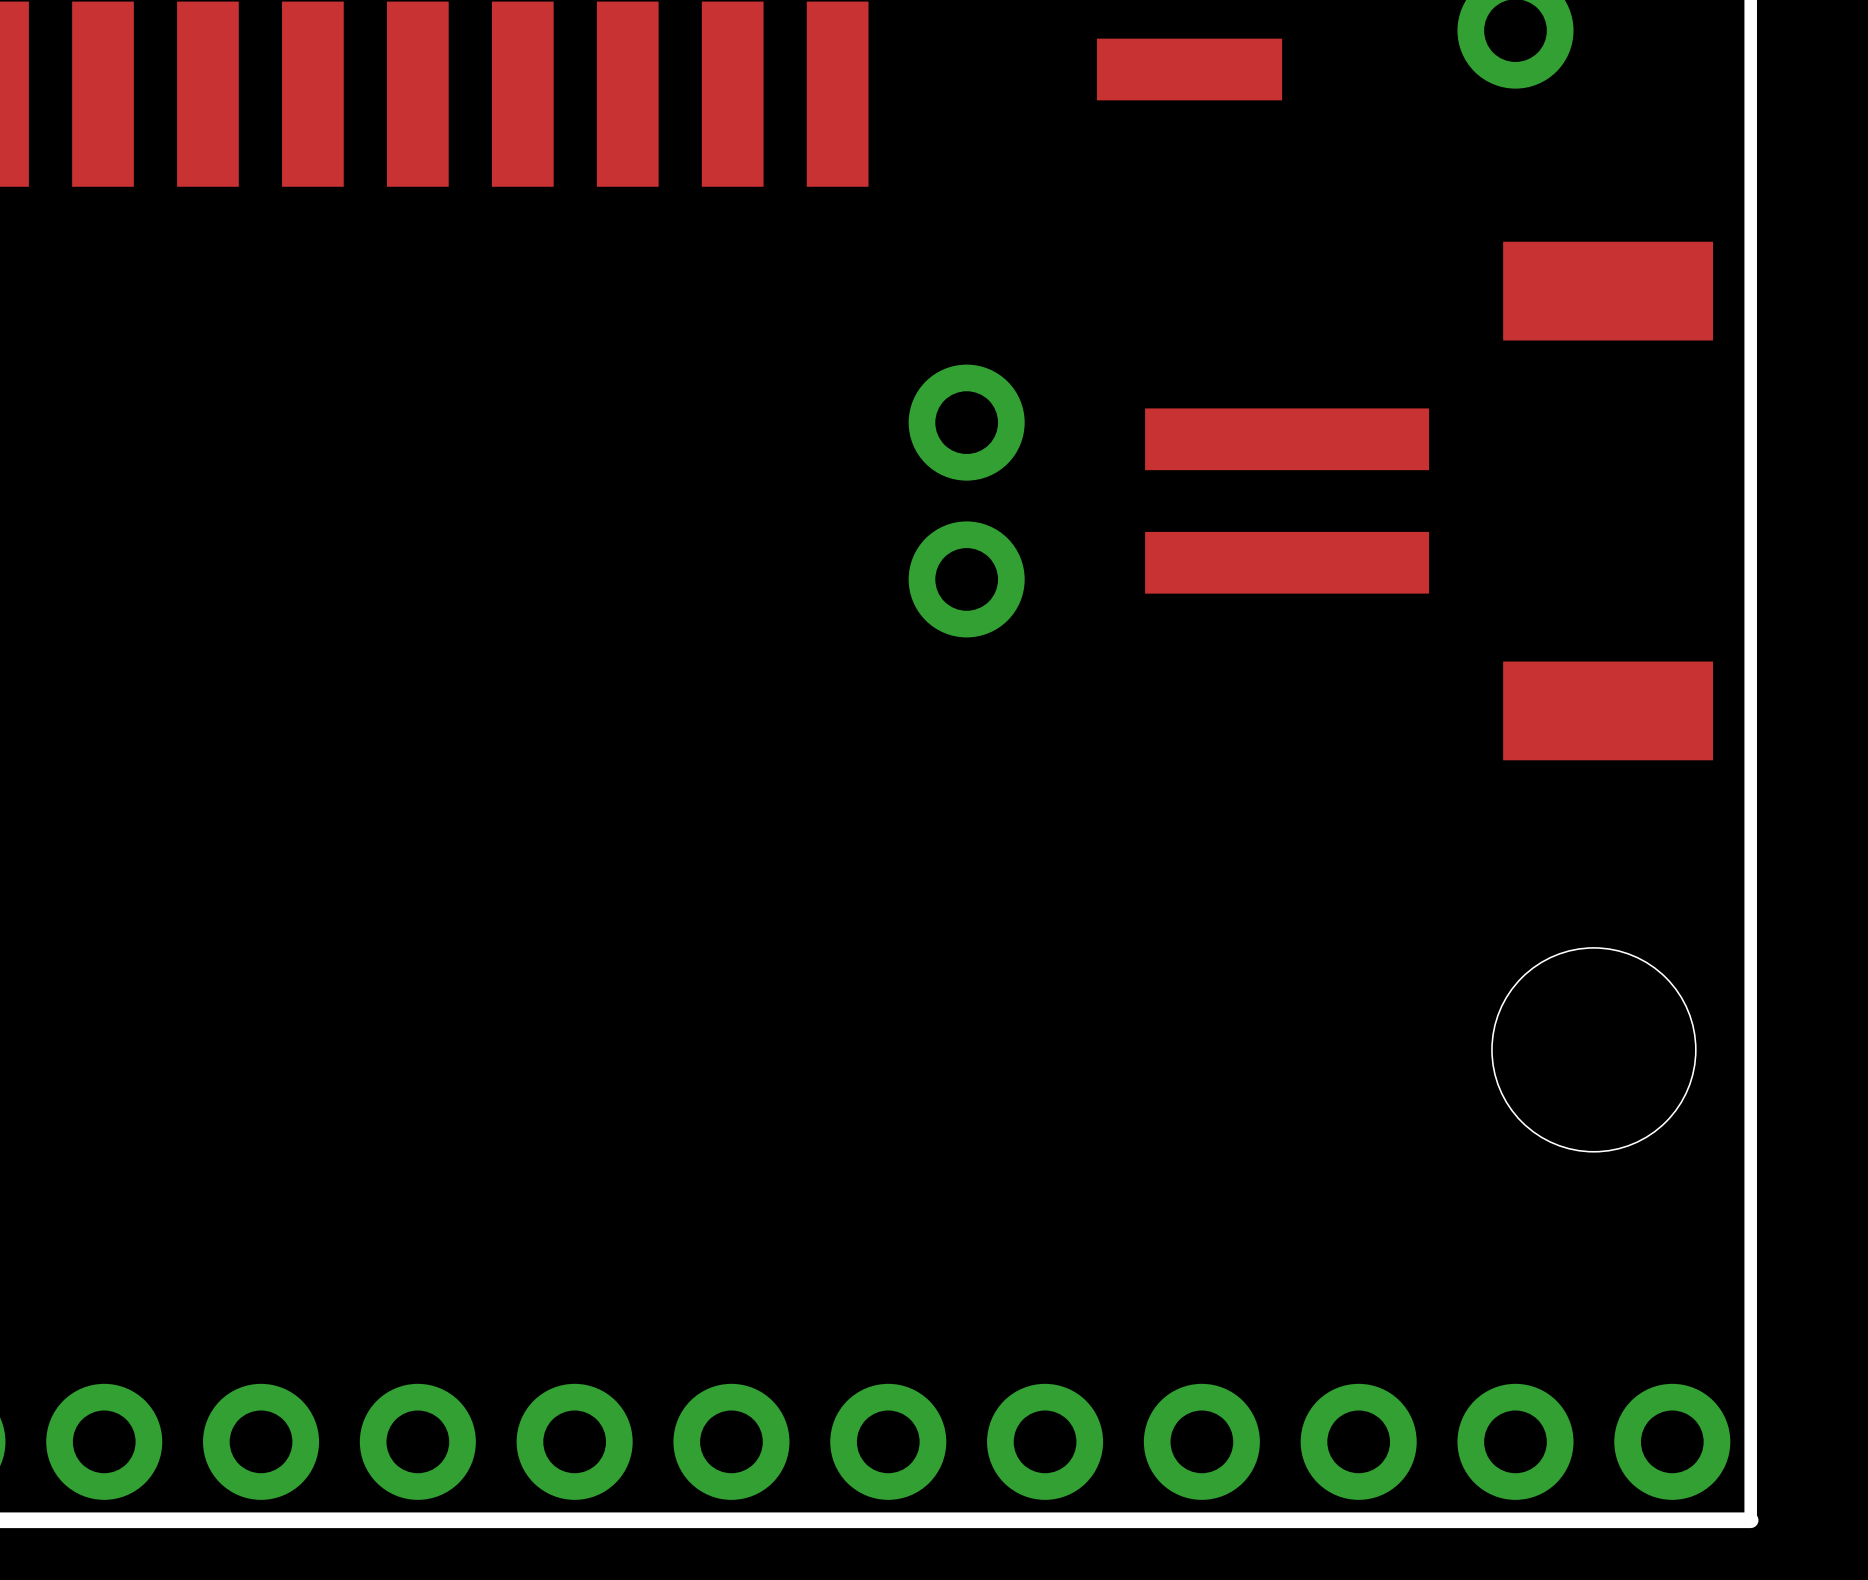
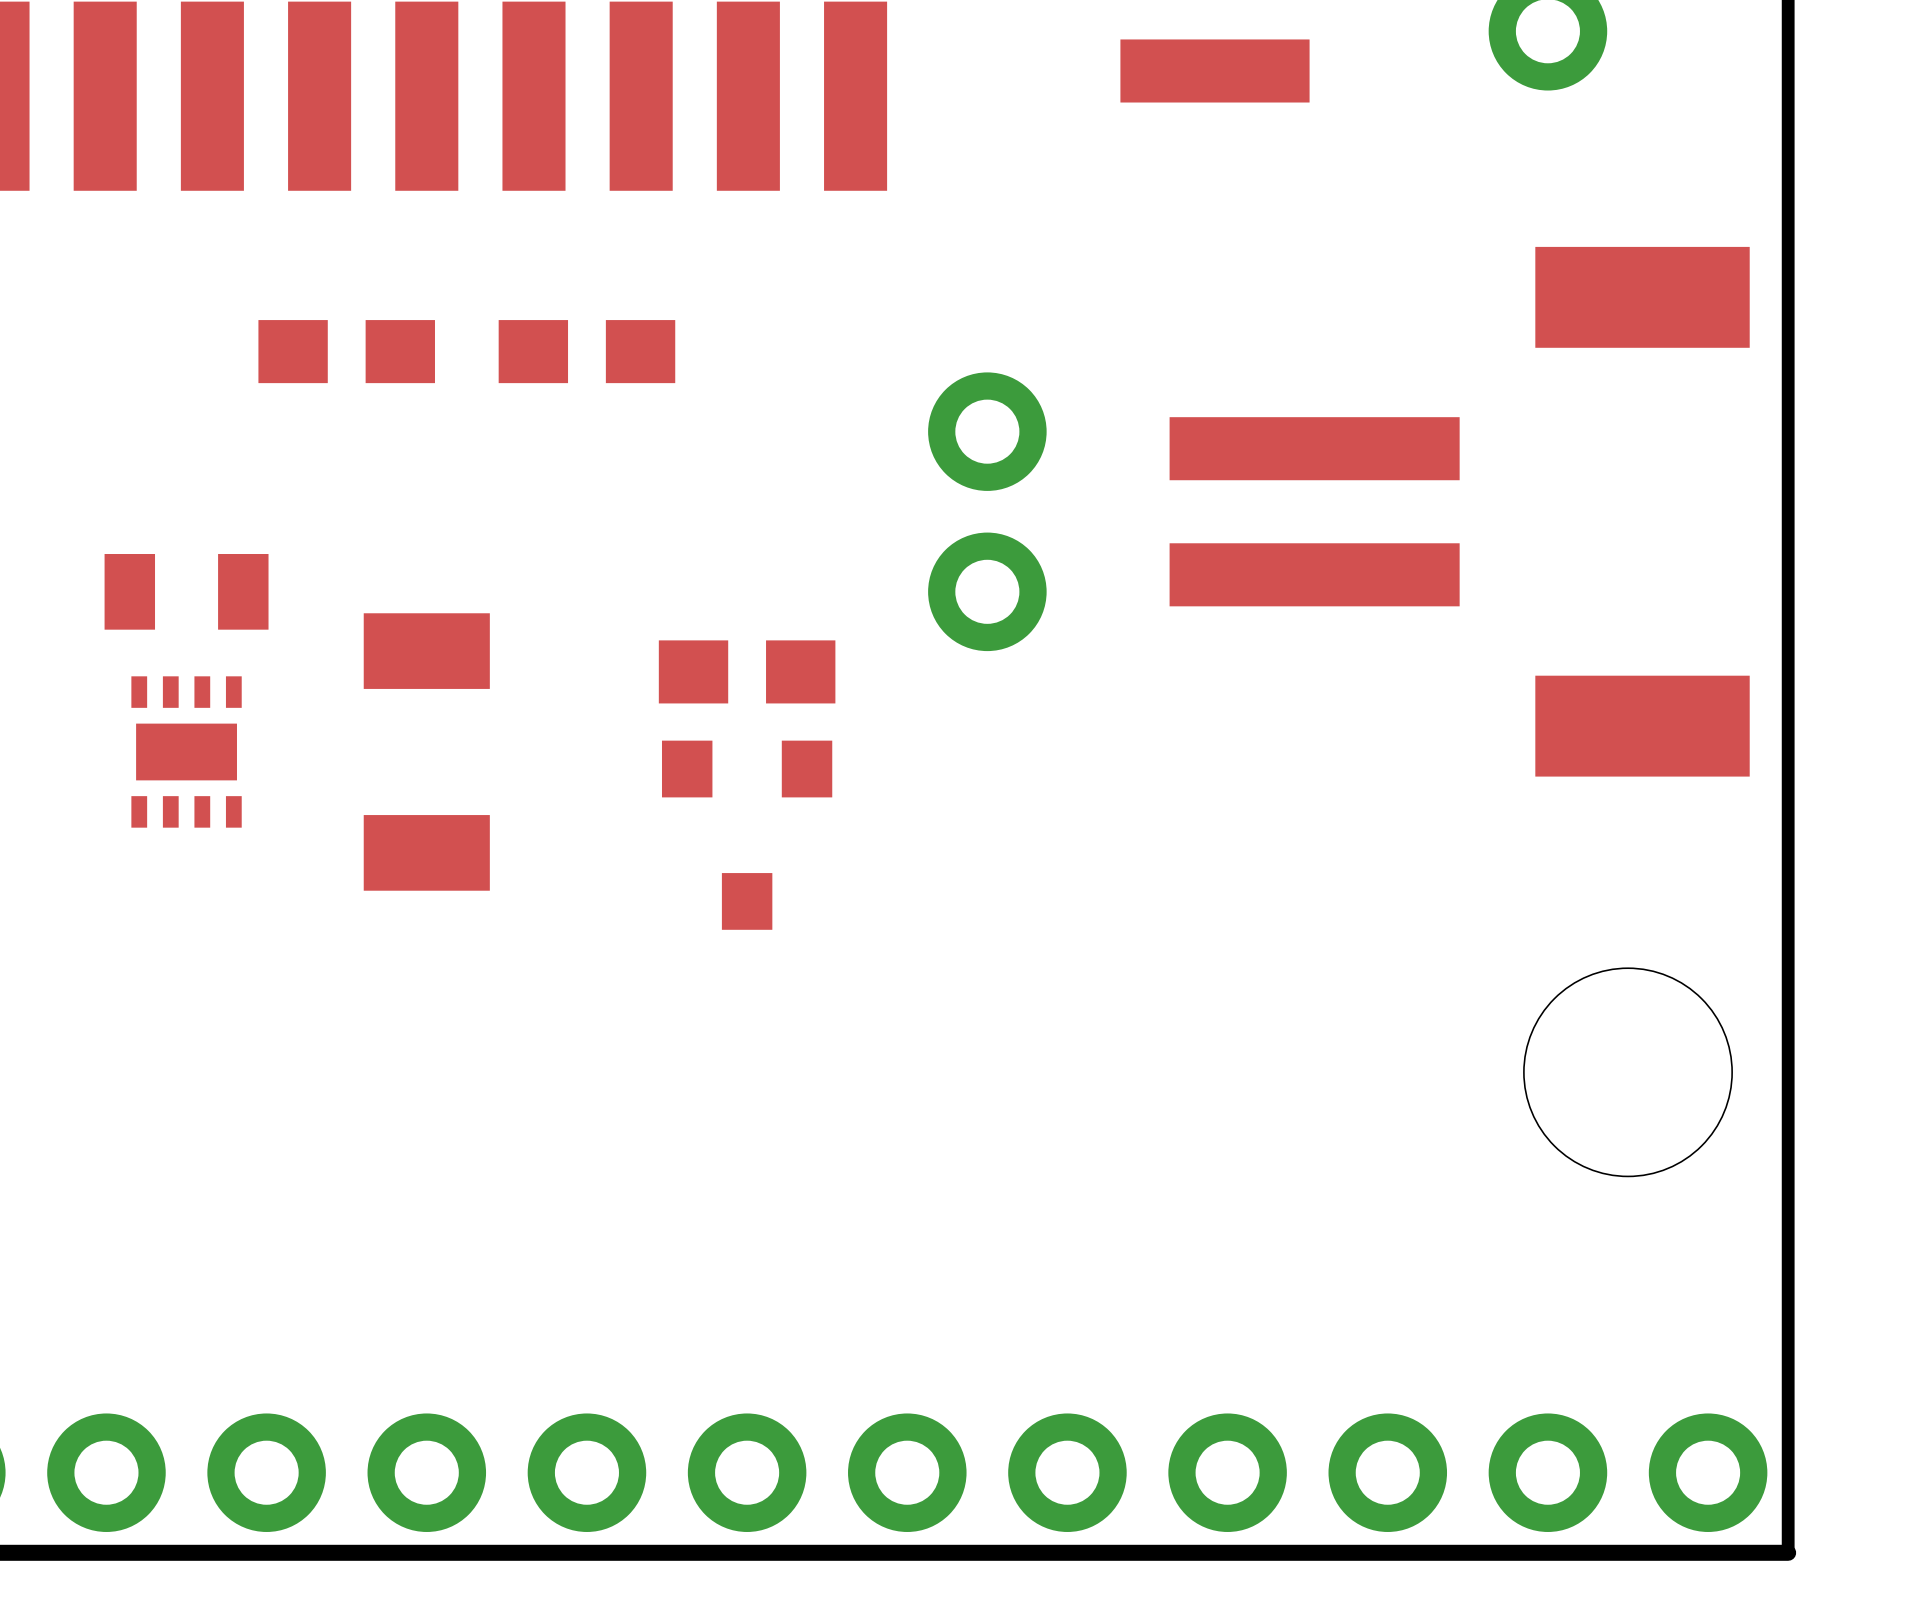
part: none -> (346, 351)
part: none -> (586, 351)
part: none -> (186, 591)
part: none -> (747, 671)
part: none -> (186, 751)
part: none -> (426, 751)
part: none -> (747, 835)

